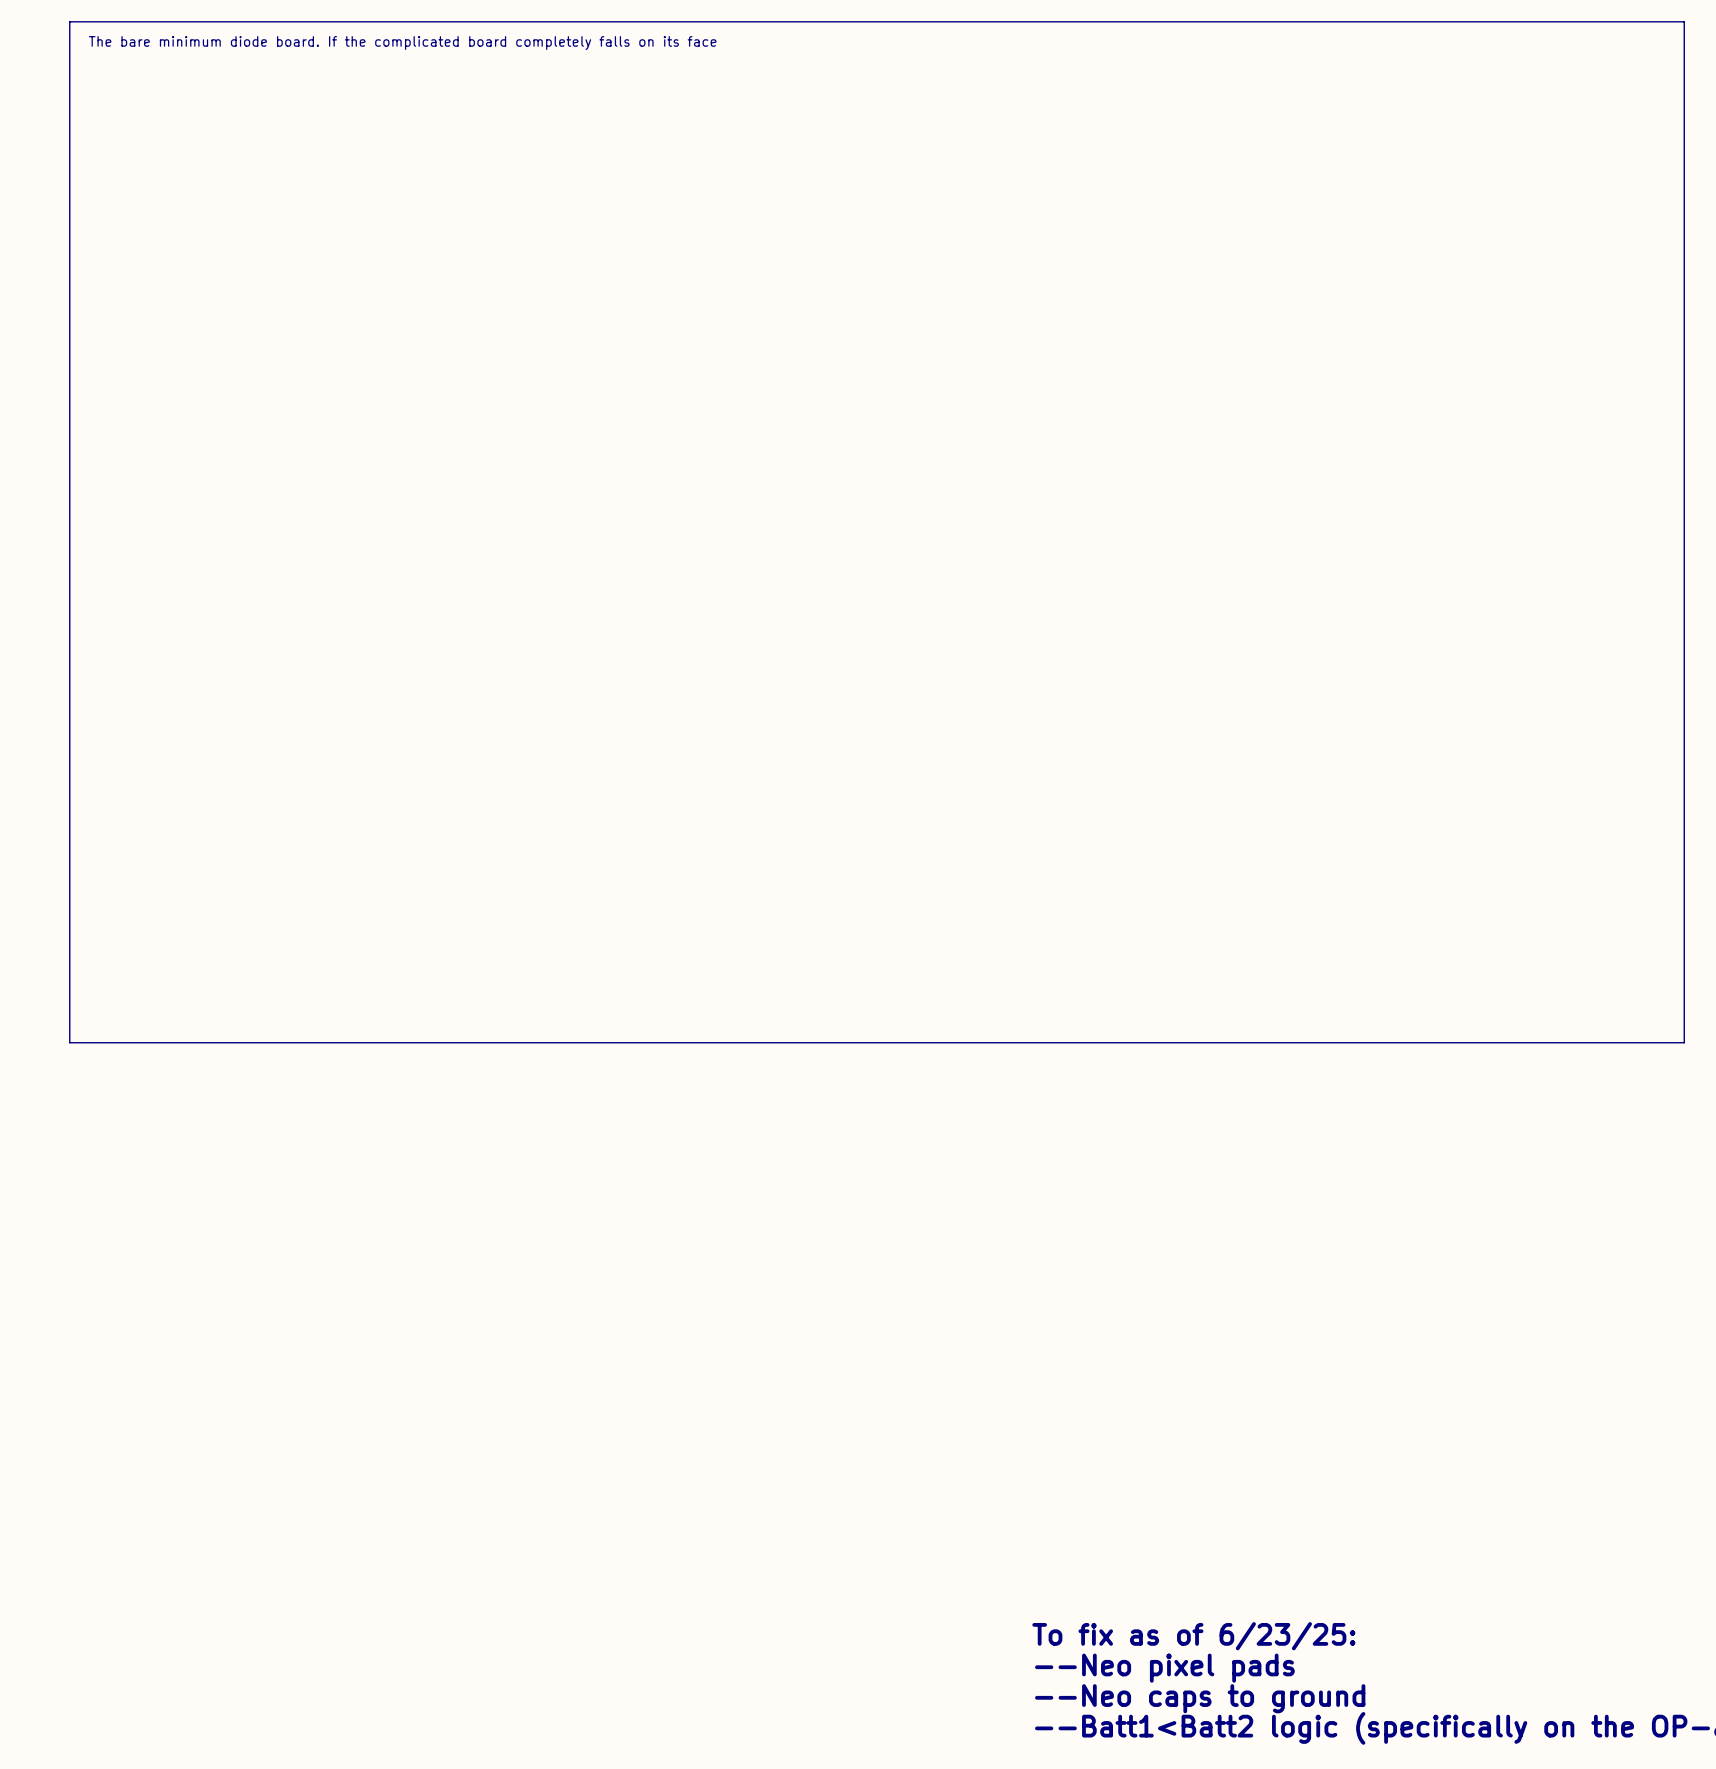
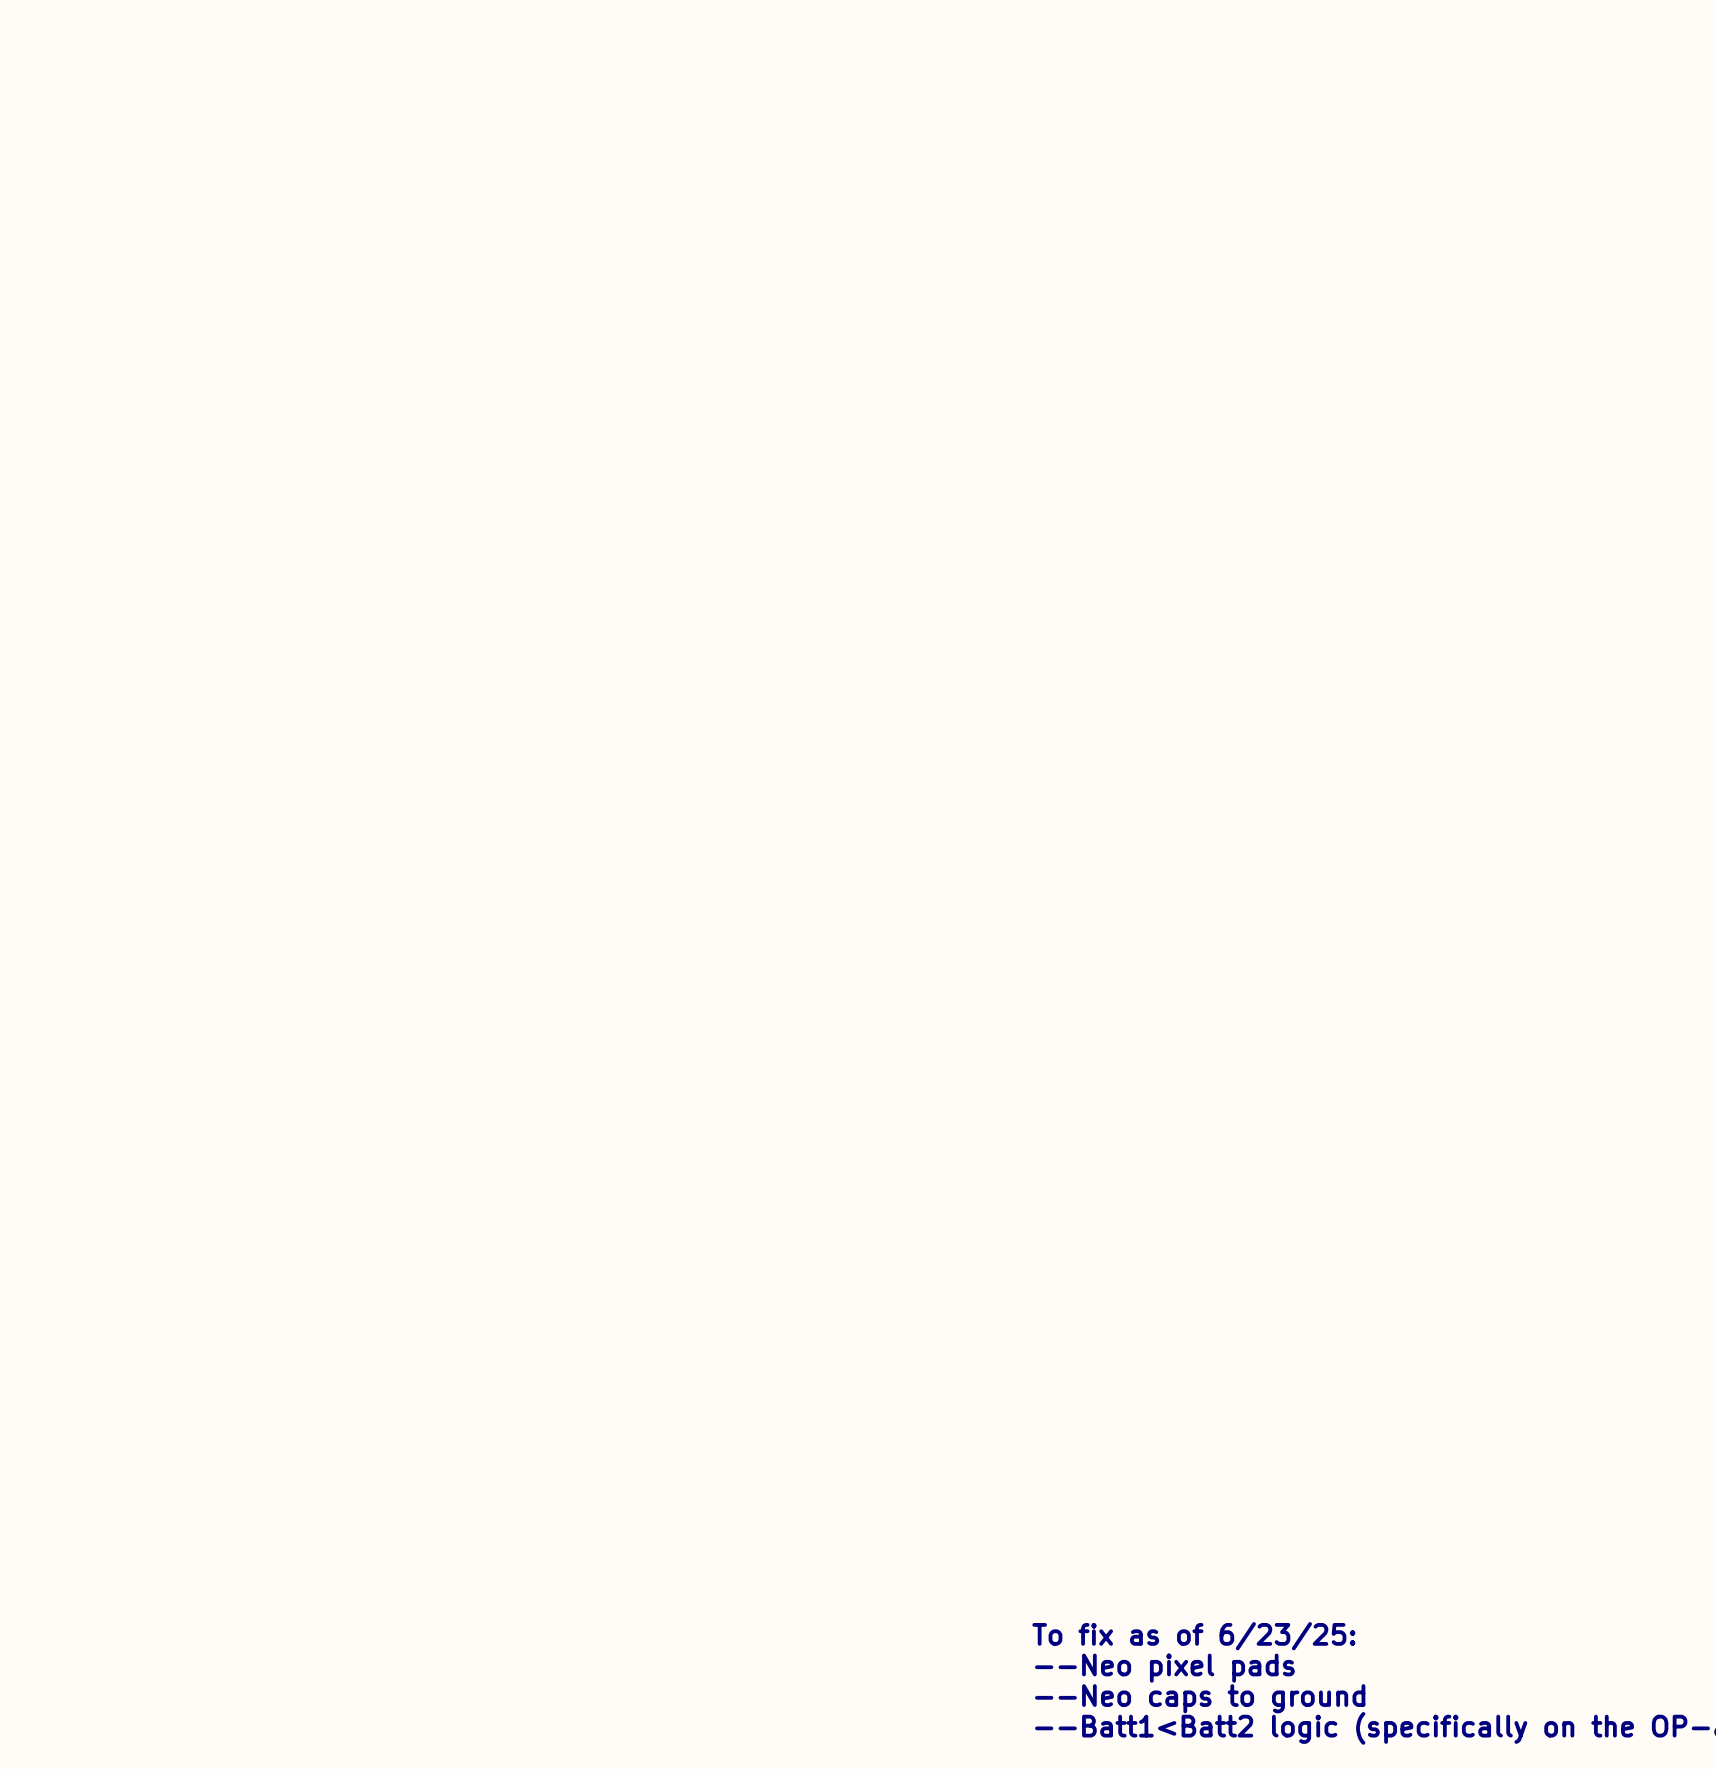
line: (69, 21) (1684, 21) (1684, 1042) (69, 1042) (69, 21) -> none
text: The bare minimum diode board. If the complicated board completely falls on its face (402, 43) -> none

